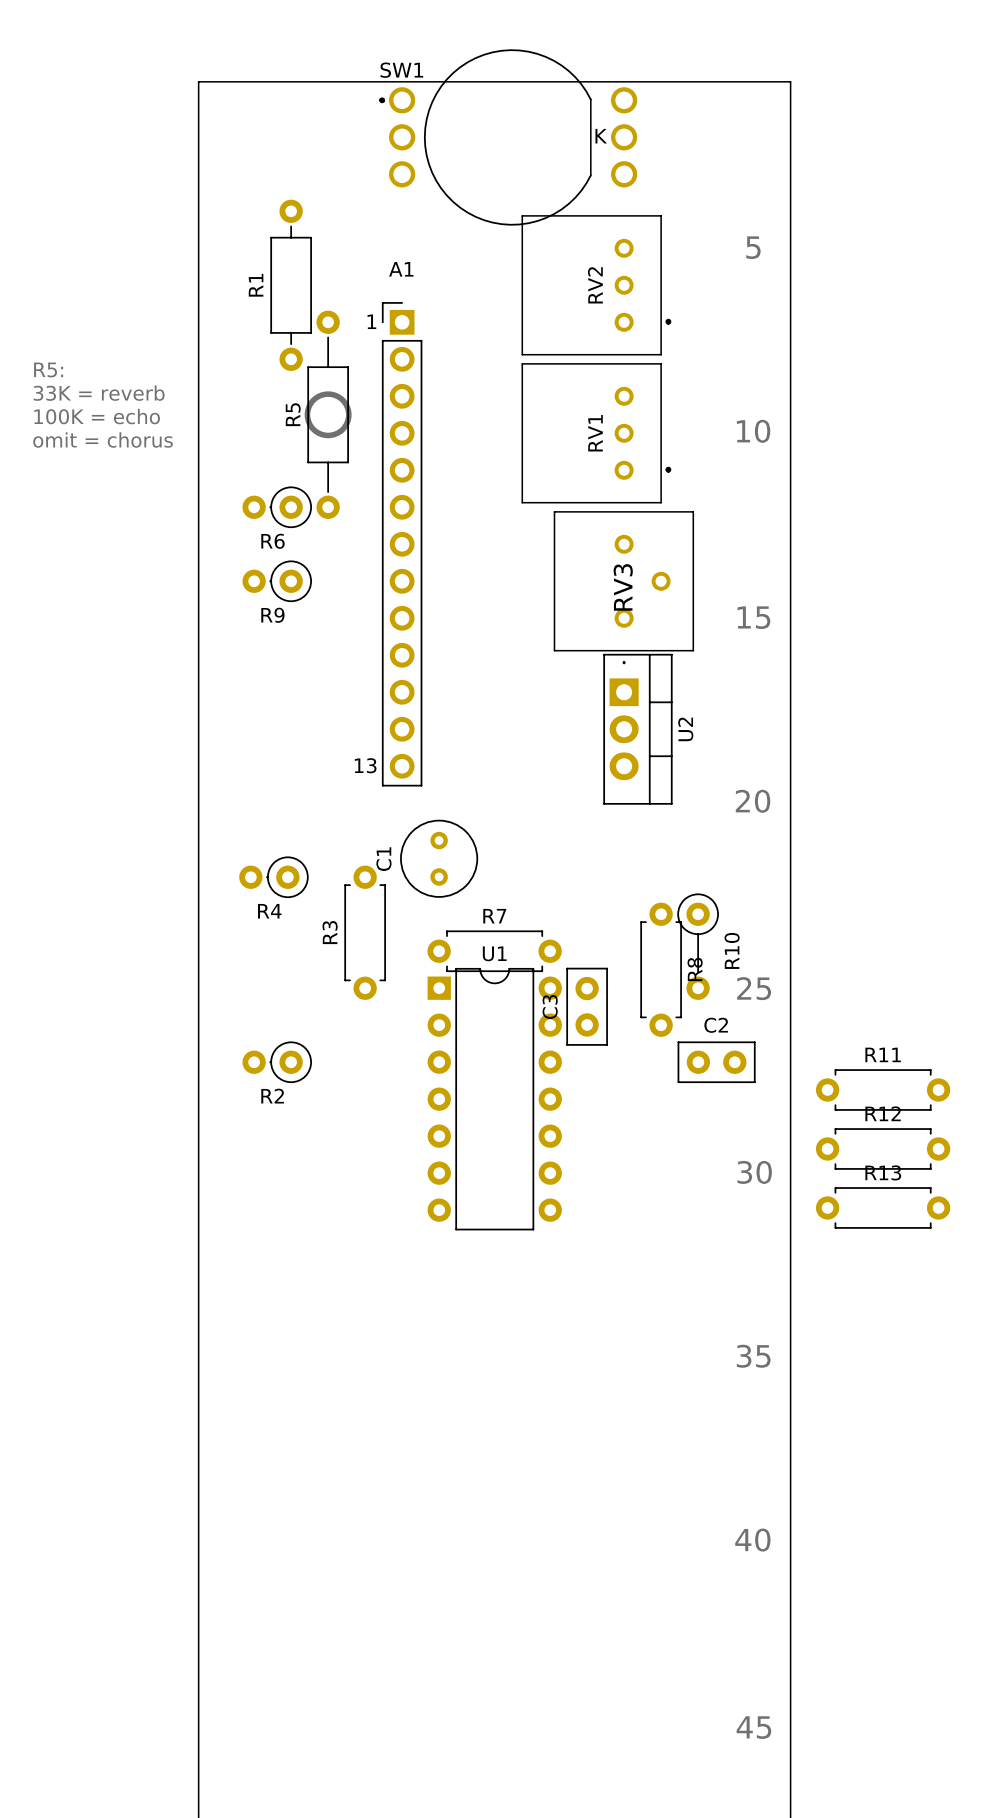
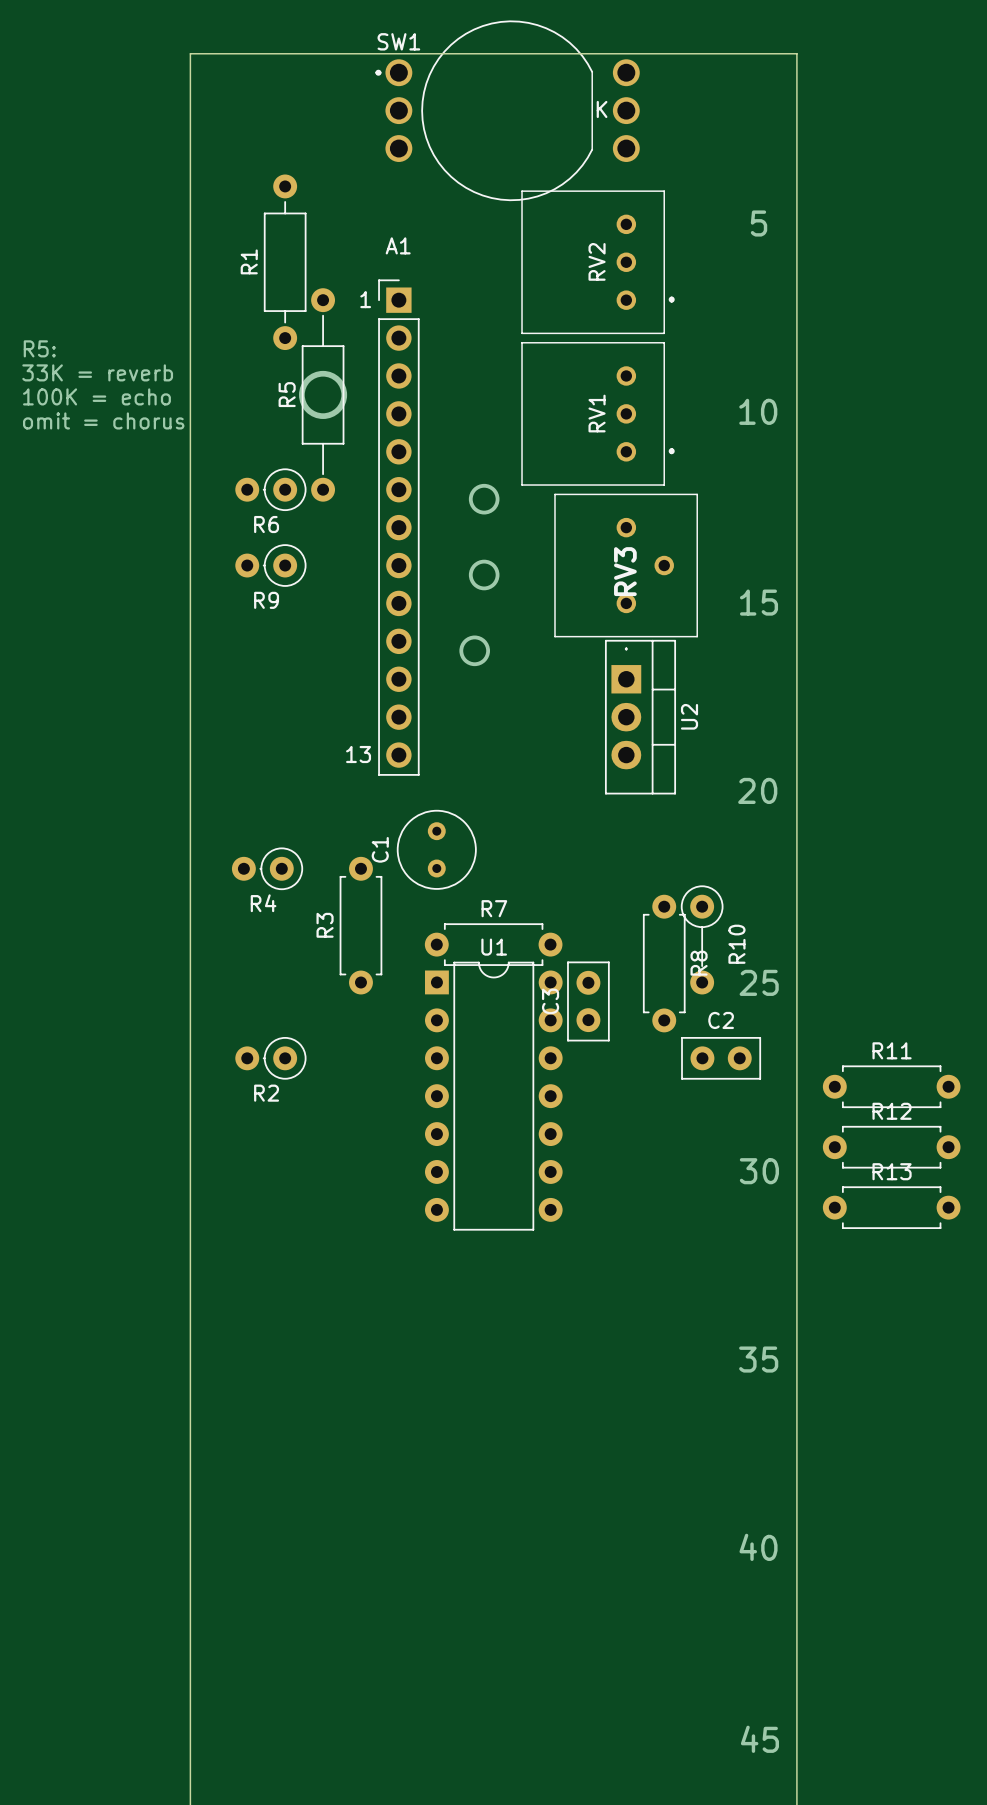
drawing: none -> [468, 483, 500, 515]
drawing: none -> [468, 559, 500, 591]
drawing: none -> [459, 635, 491, 667]

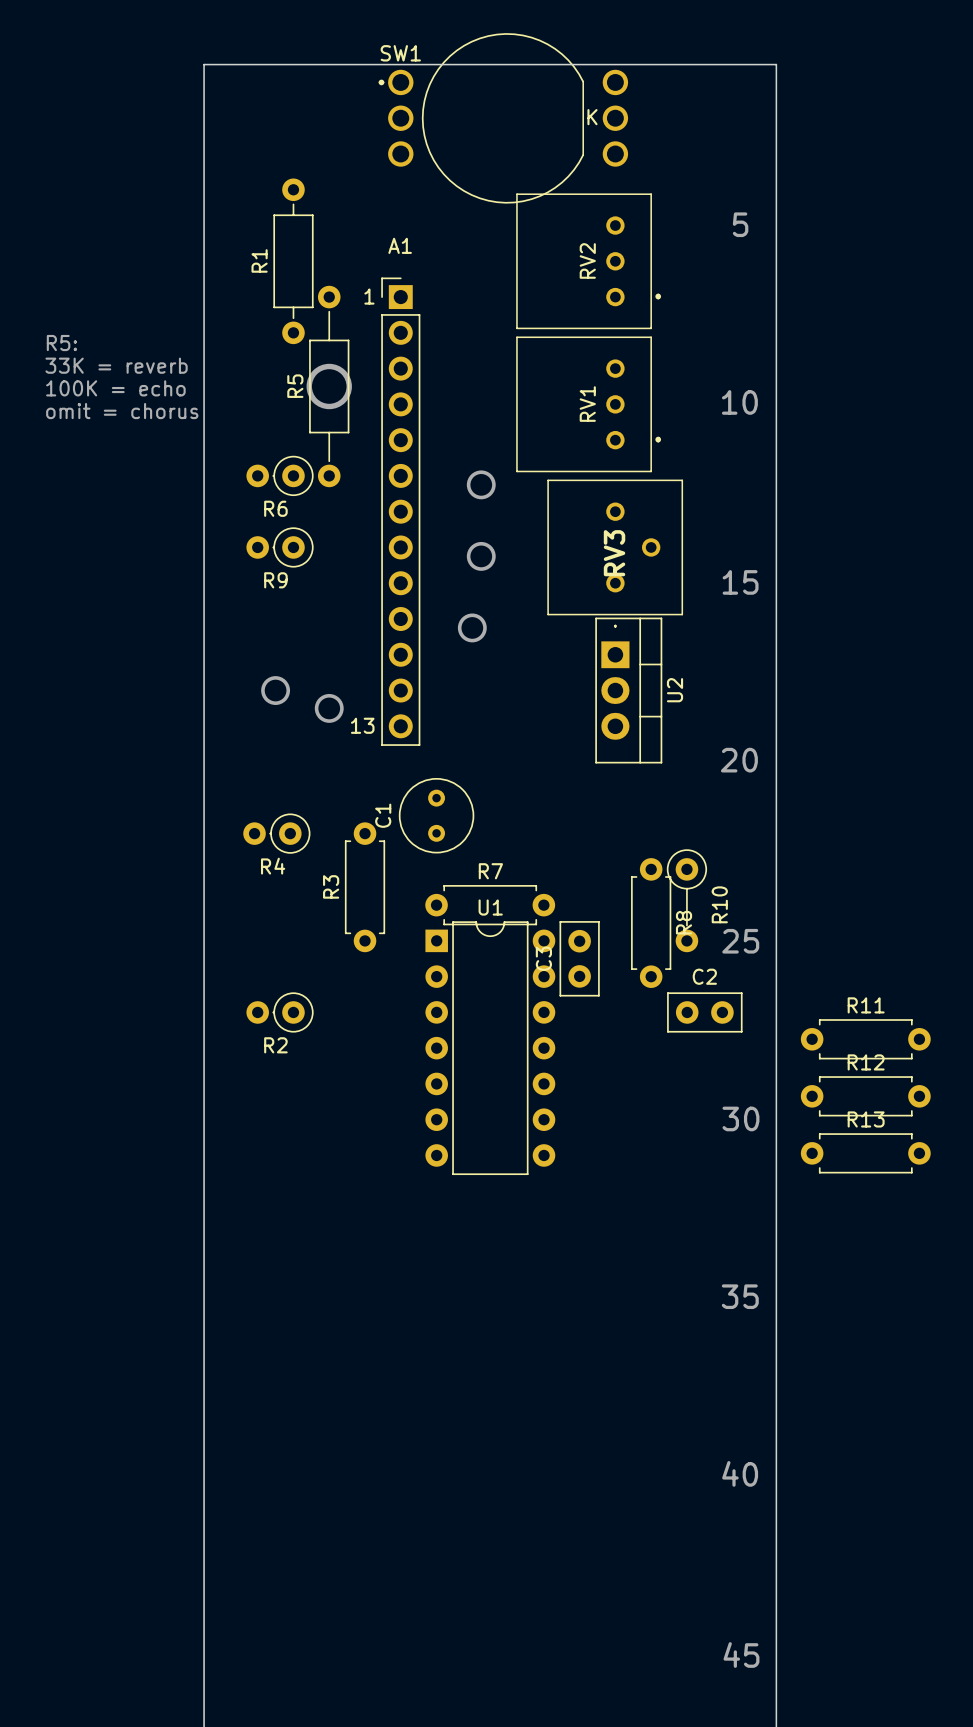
drawing: none -> [261, 676, 291, 705]
drawing: none -> [314, 693, 344, 723]

